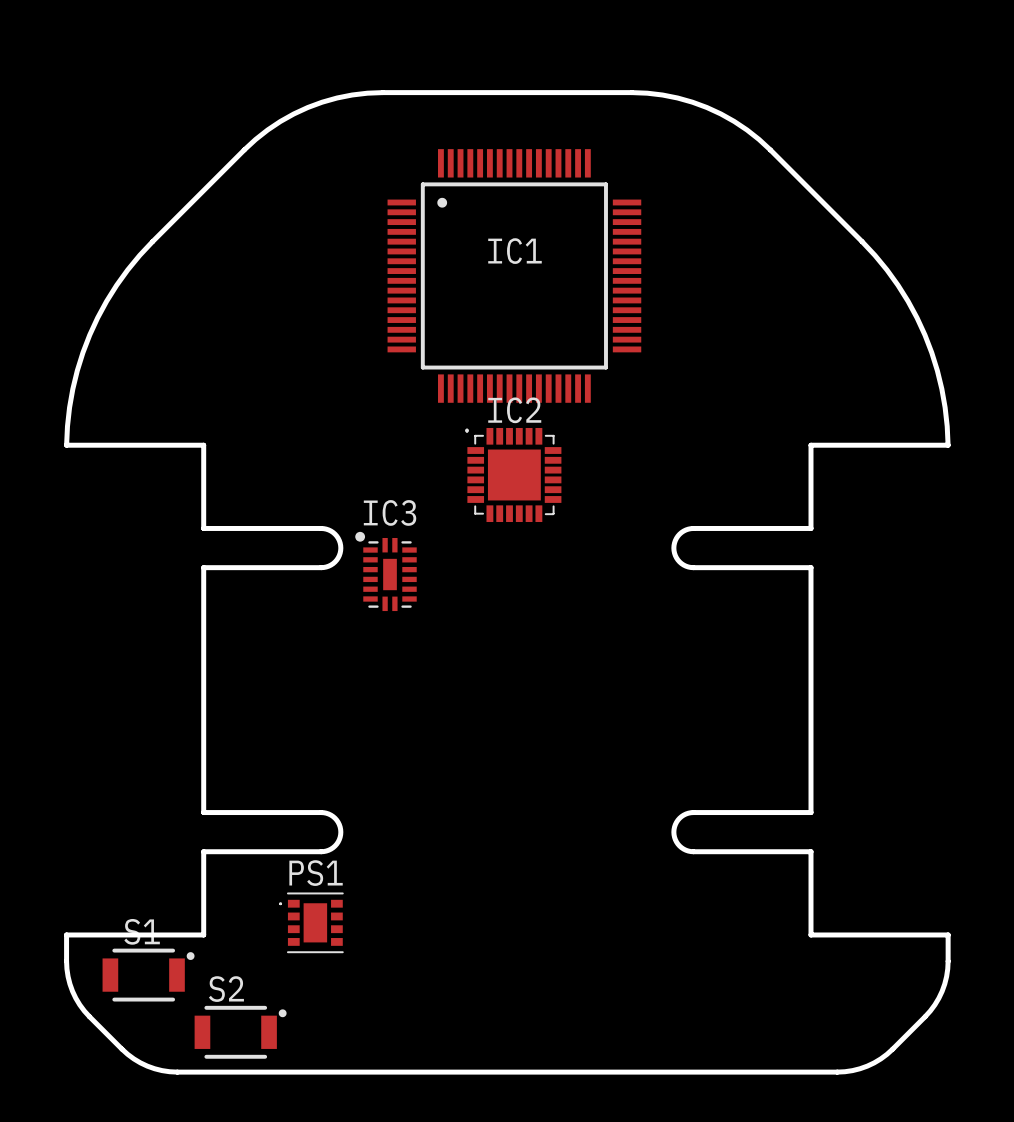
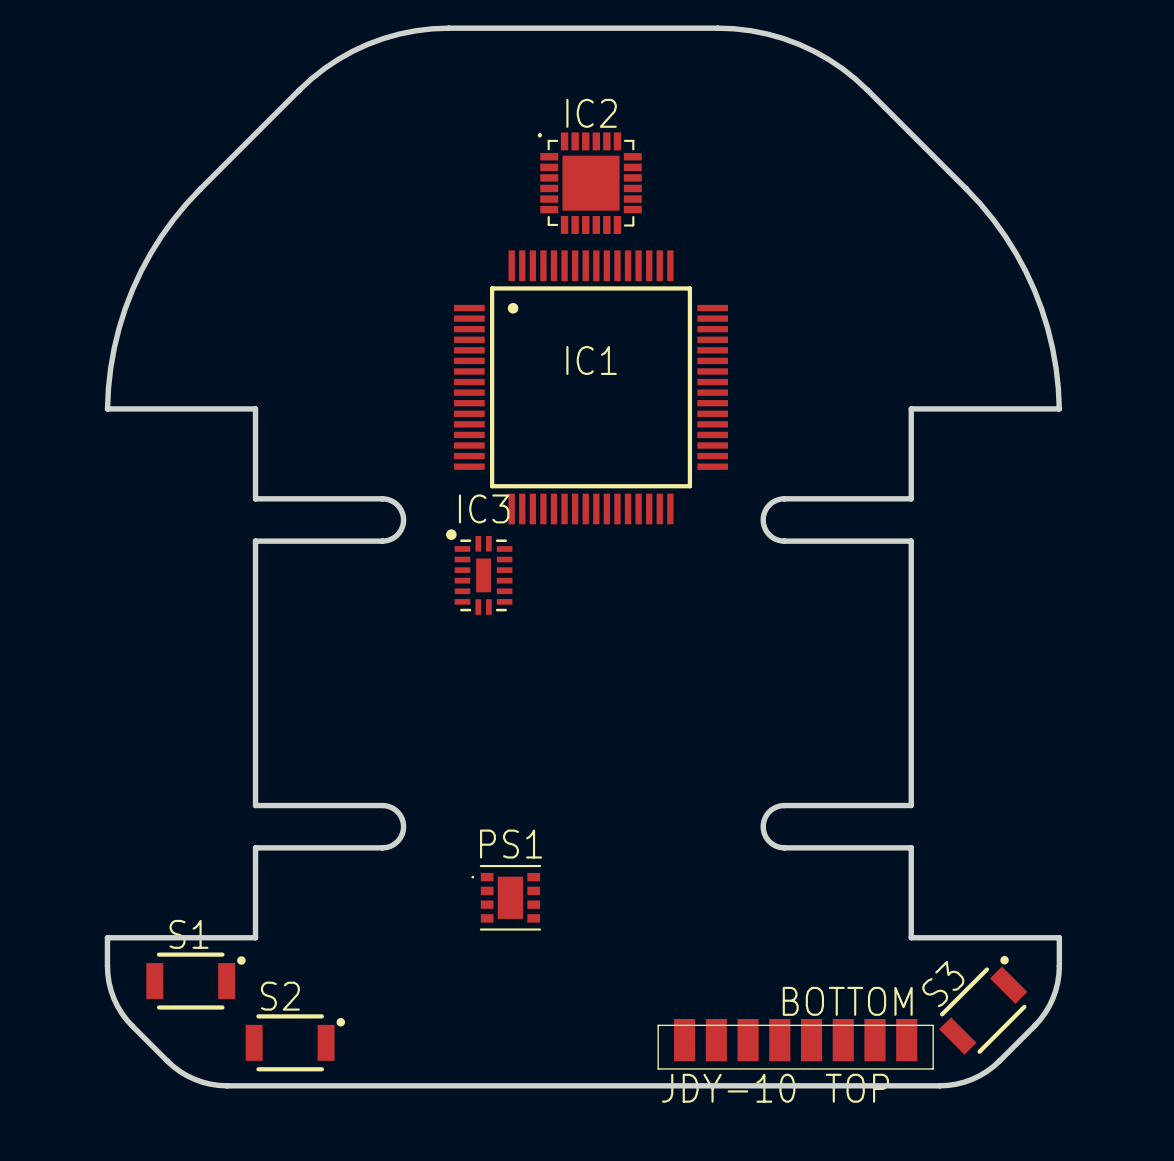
IC1 position: (514, 275) -> (591, 387)
IC2 position: (513, 474) -> (589, 183)
IC3 position: (385, 571) -> (479, 572)
PS1 position: (311, 922) -> (506, 897)
S3: none -> (983, 1005)
part: none -> (795, 1044)

